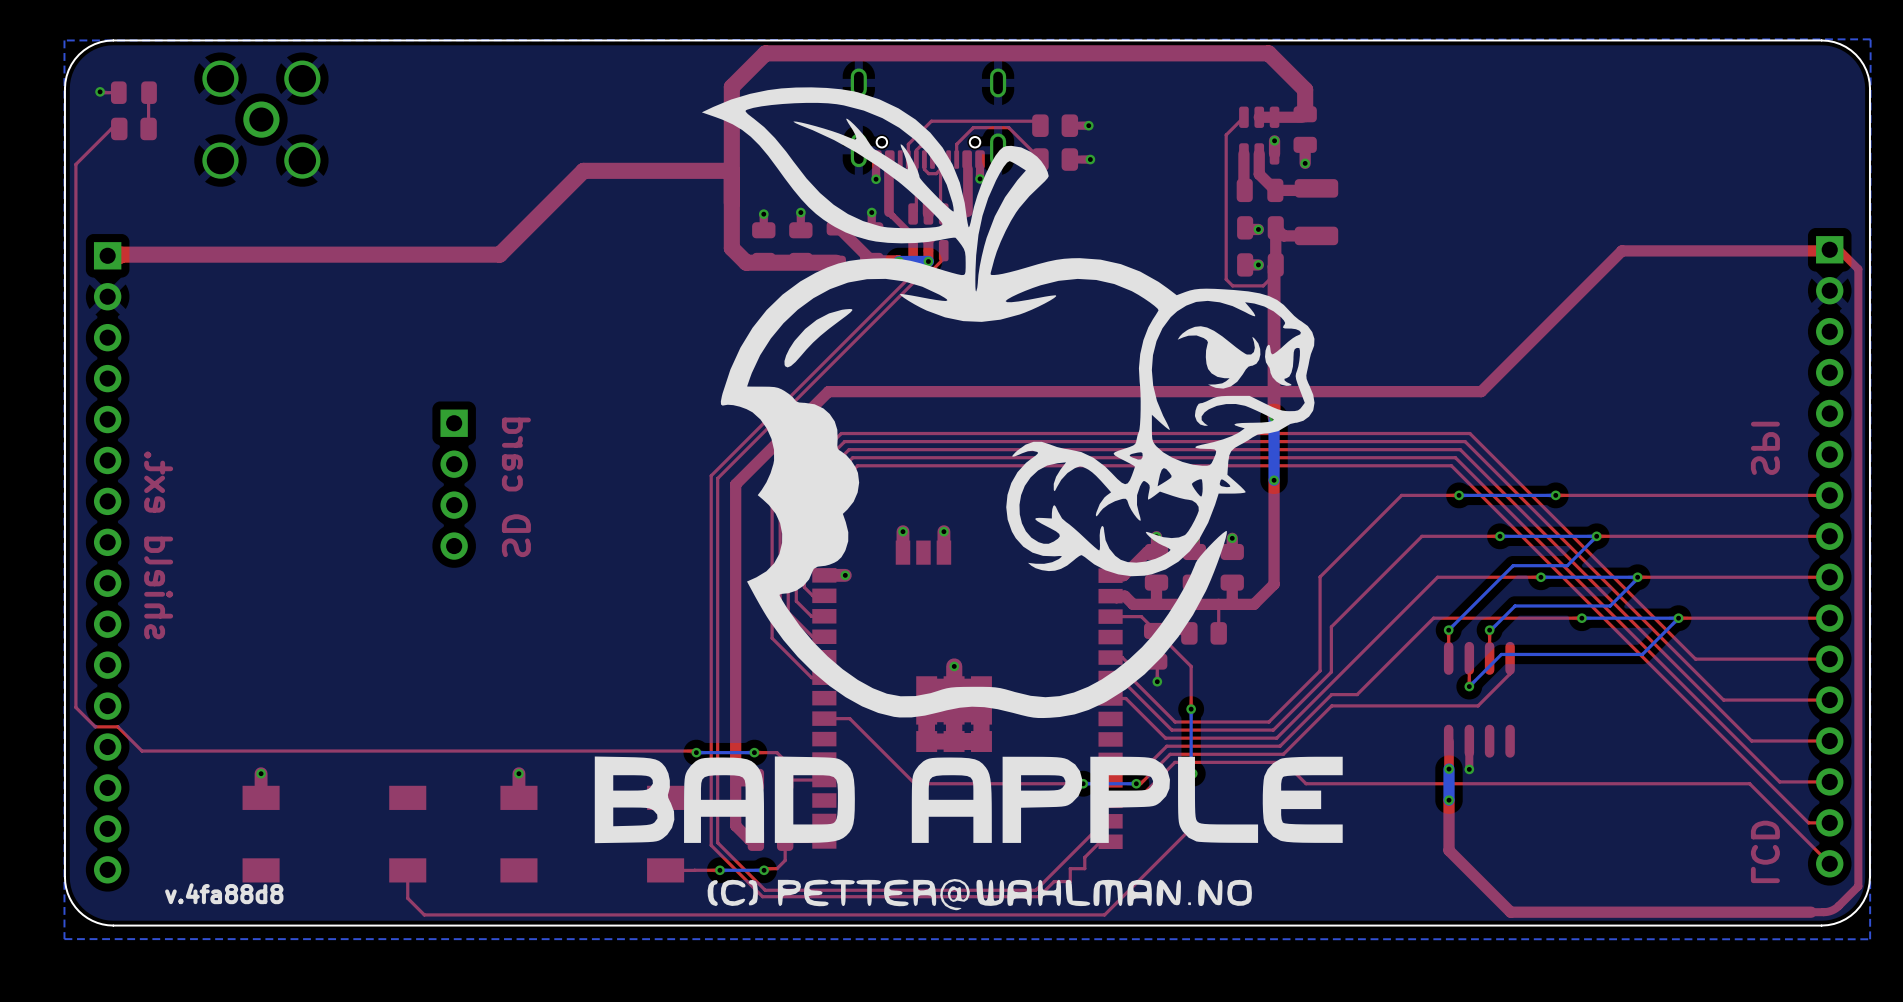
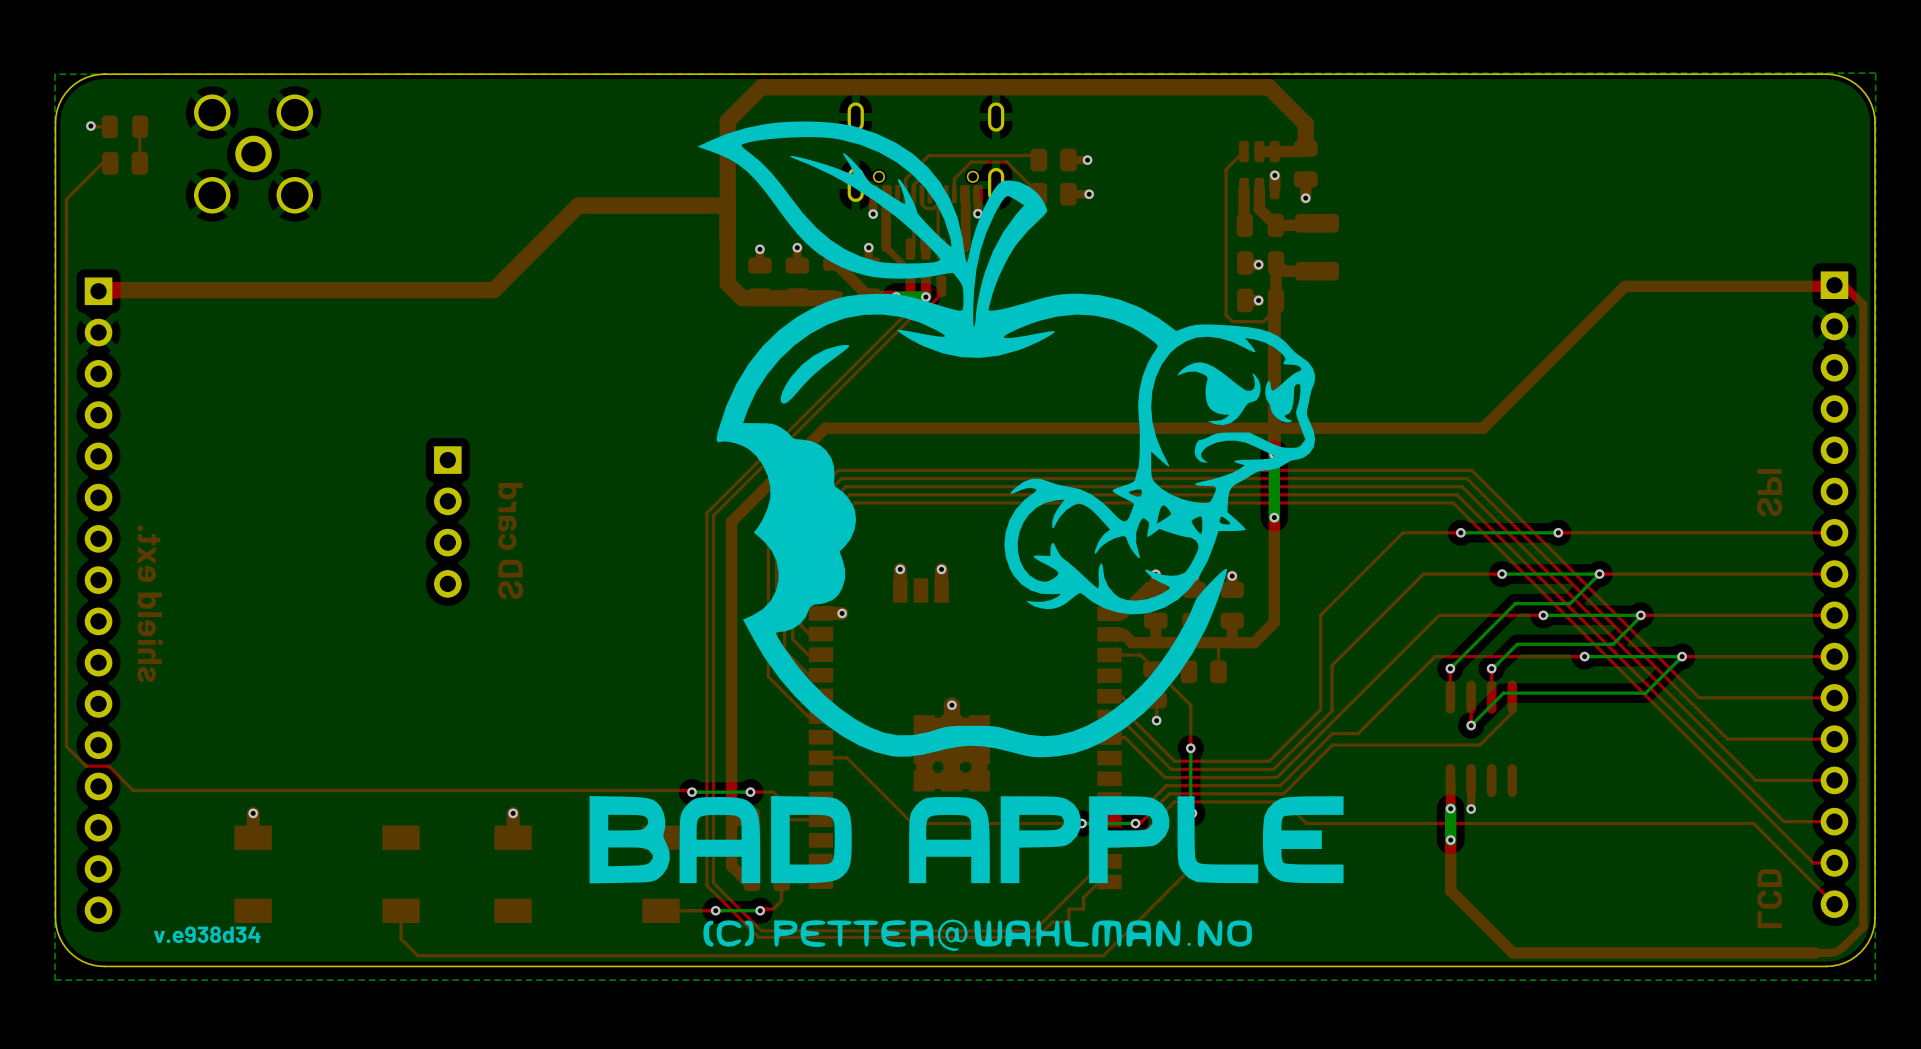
text: v.4fa88d8 (224, 893) -> v.e938d34 (207, 934)

